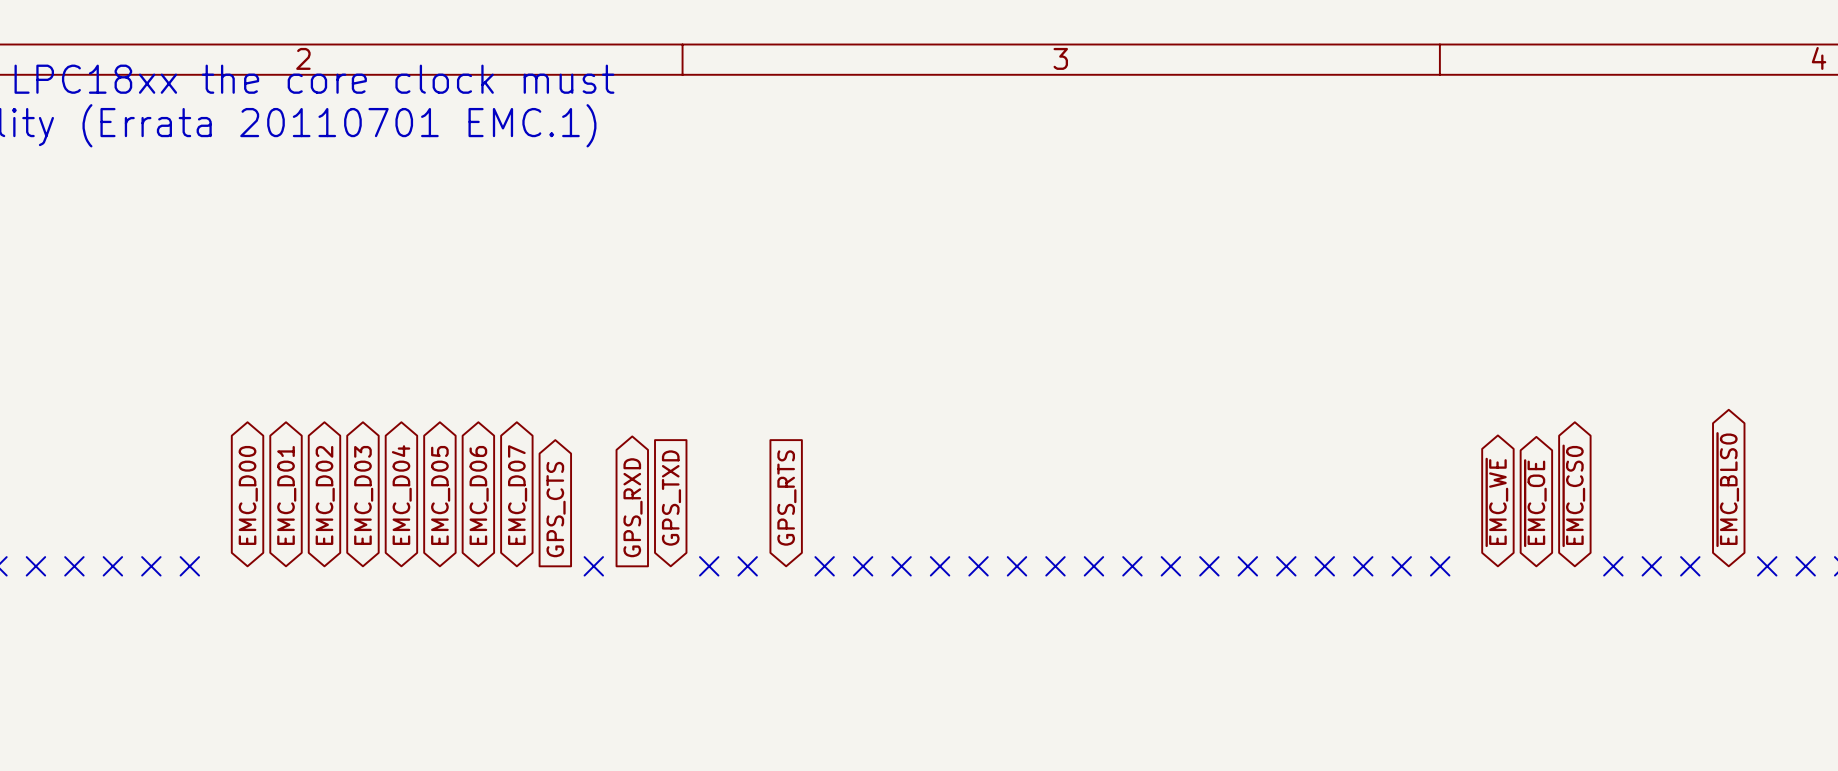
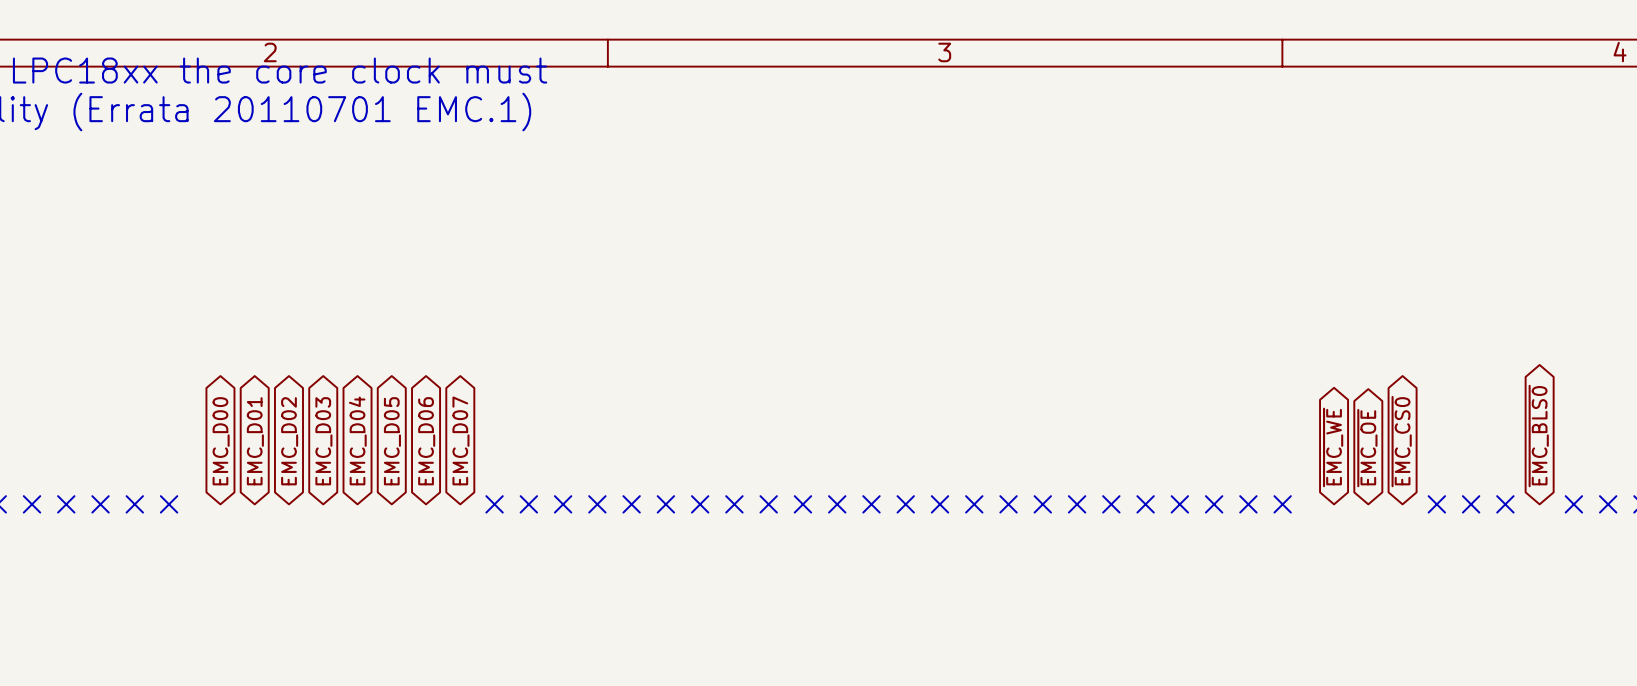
global label: GPS_TXD (671, 498) -> none
global label: GPS_RTS (786, 498) -> none
global label: GPS_RXD (633, 507) -> none
global label: GPS_CTS (556, 509) -> none
no-connect mark: none -> (494, 504)
no-connect mark: none -> (563, 504)
no-connect mark: none -> (597, 504)
no-connect mark: none -> (700, 504)

